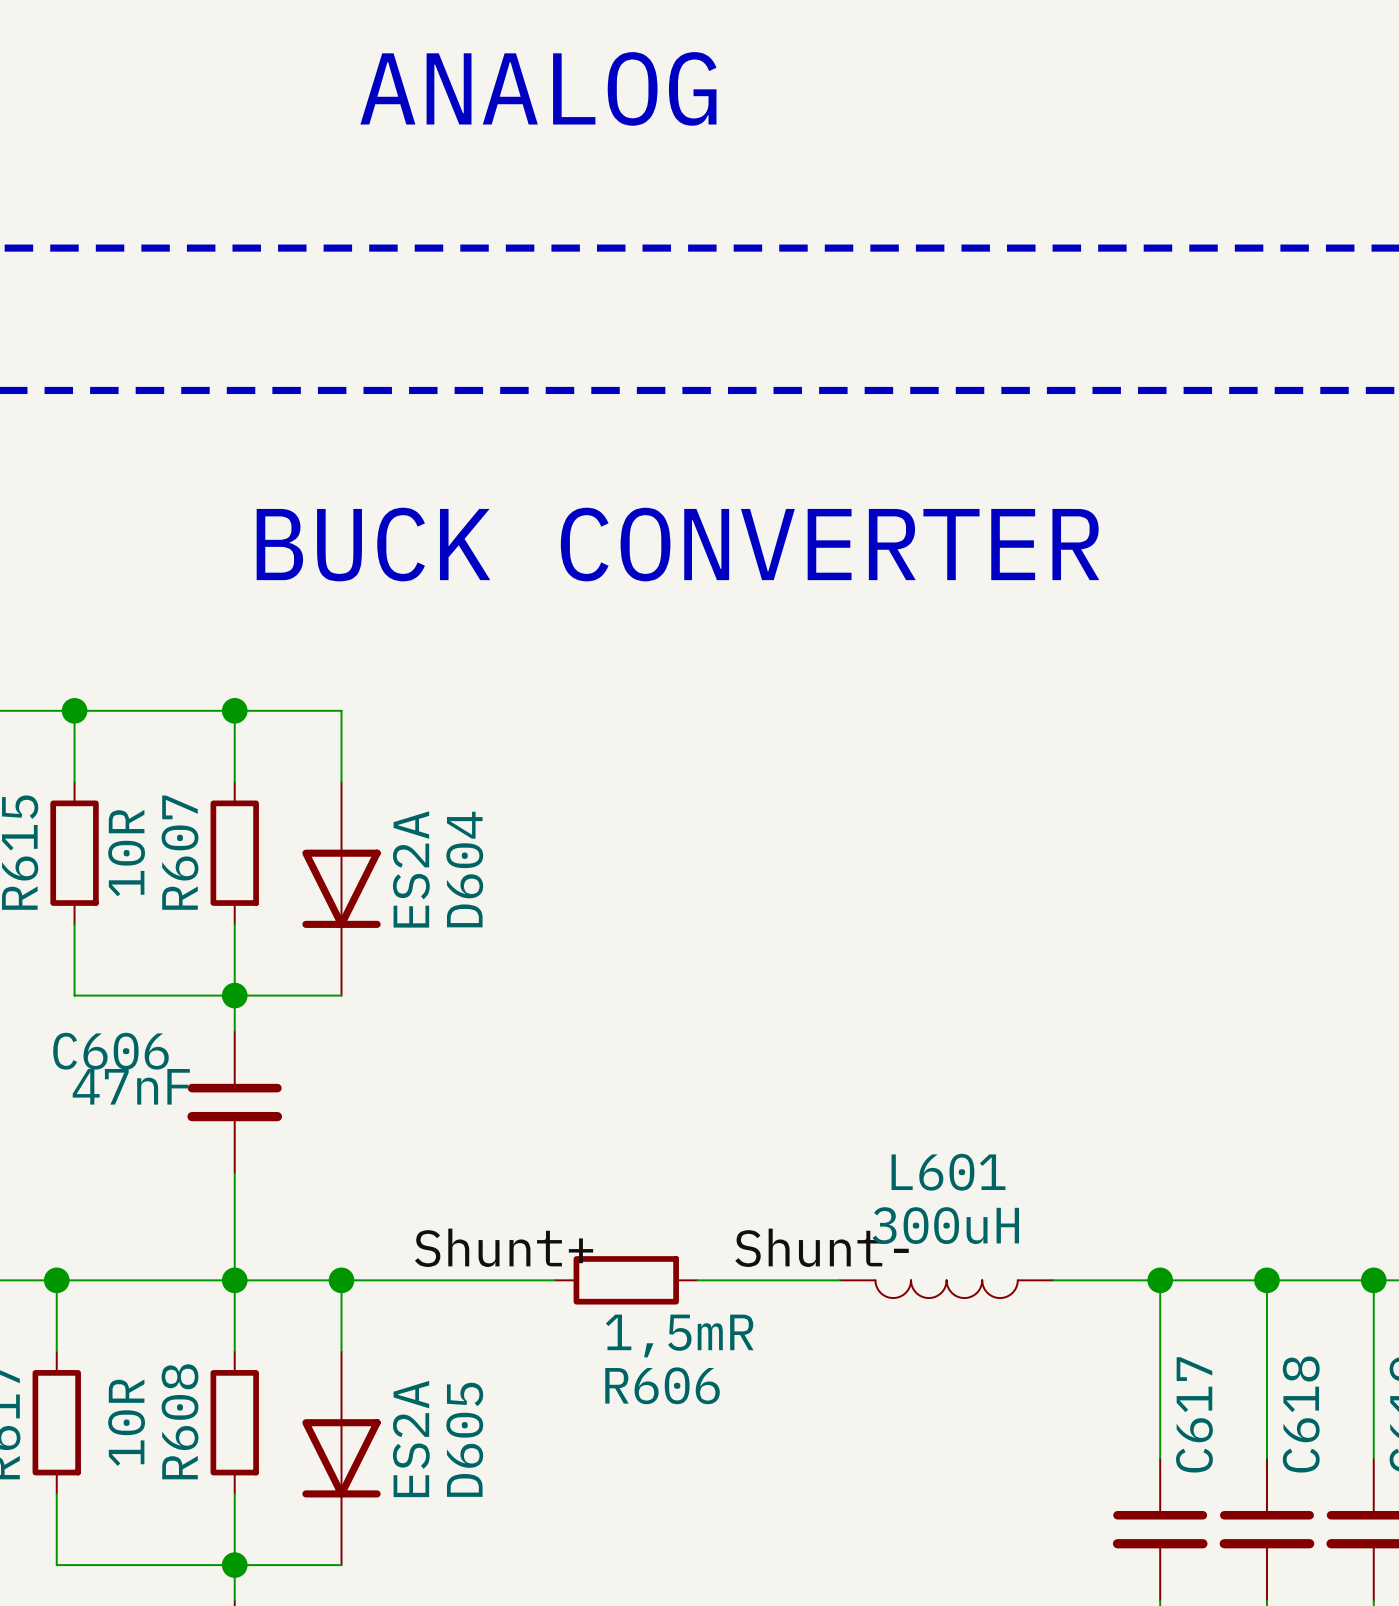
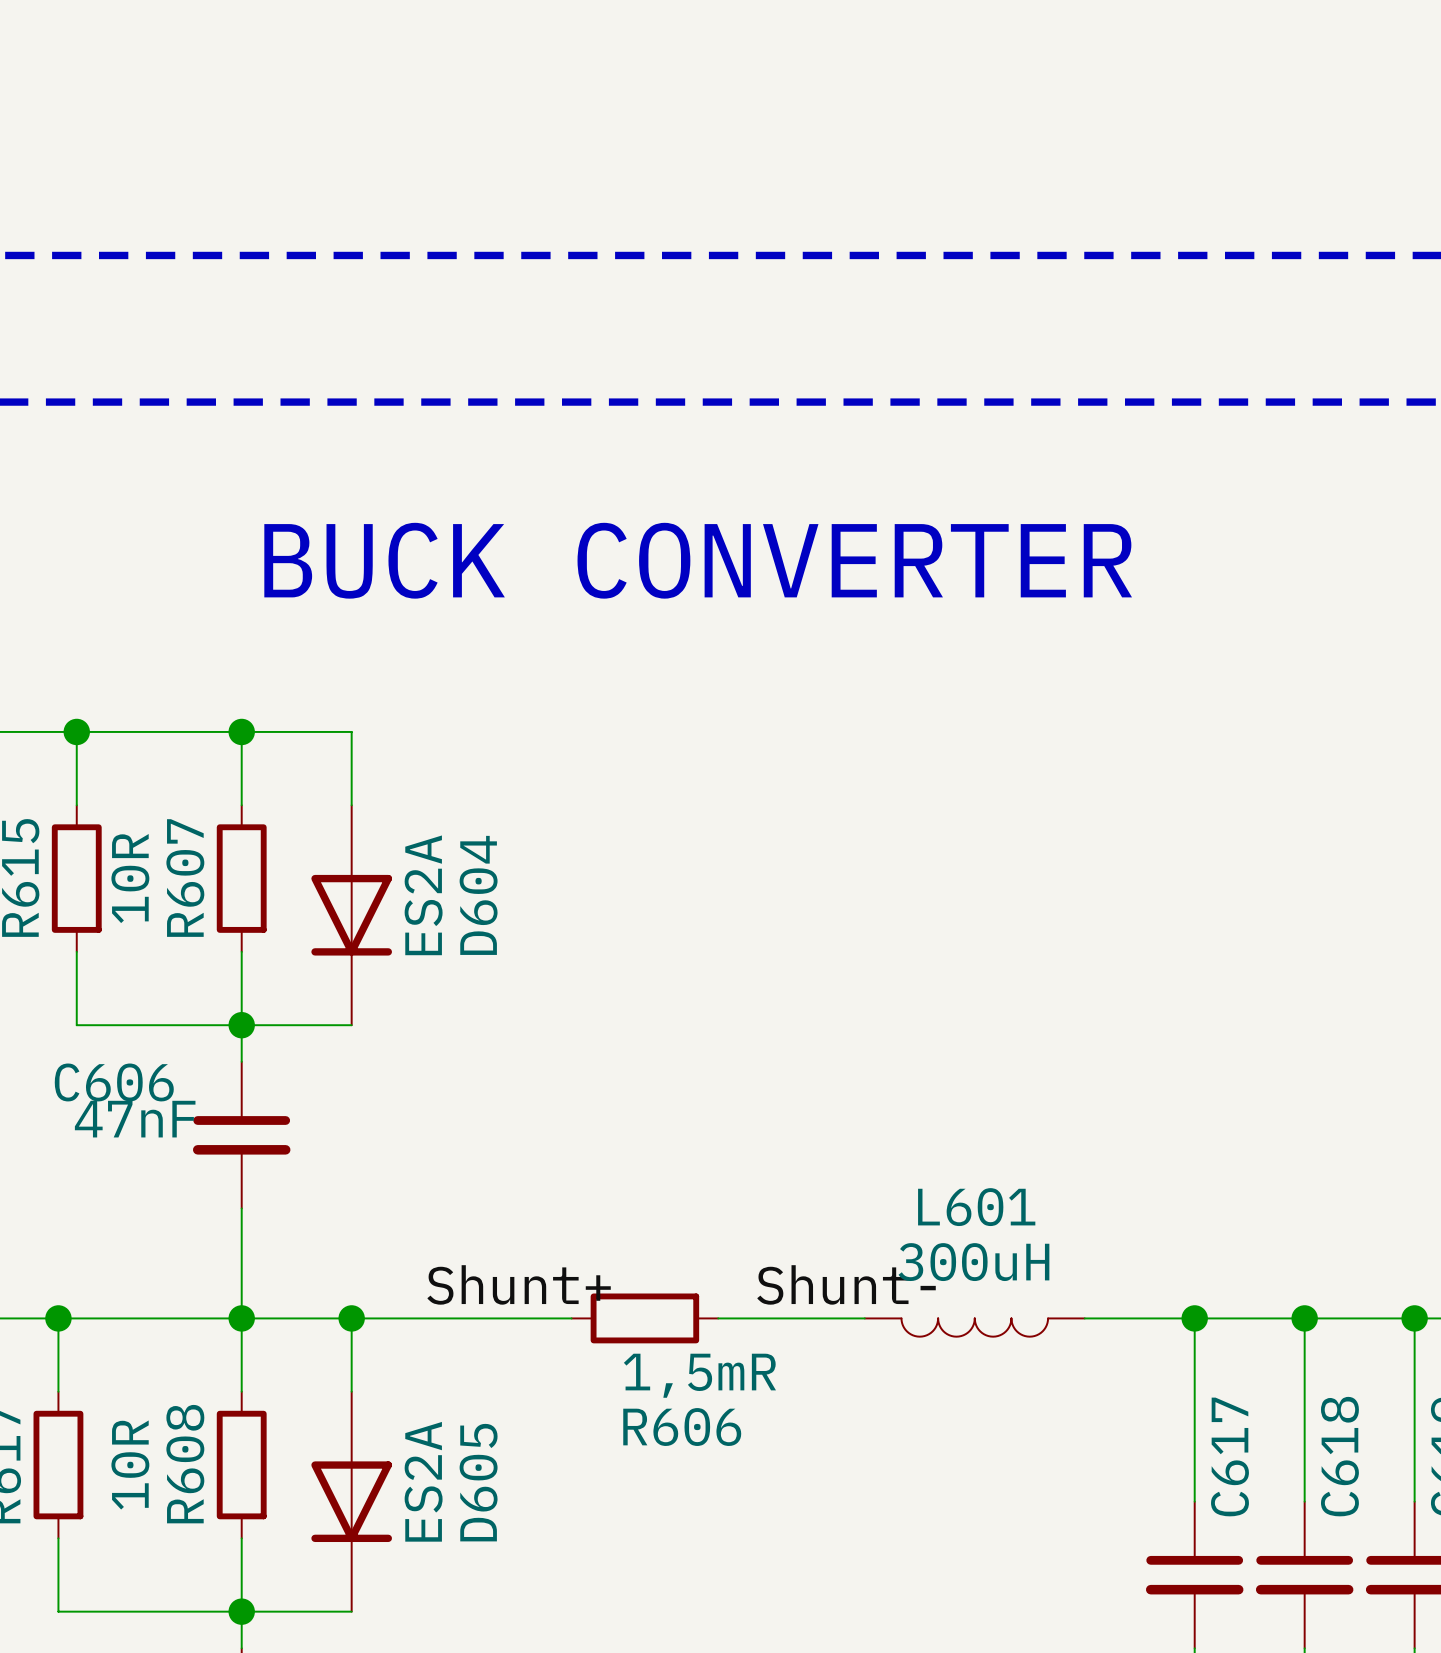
text: ANALOG (538, 88) -> none

